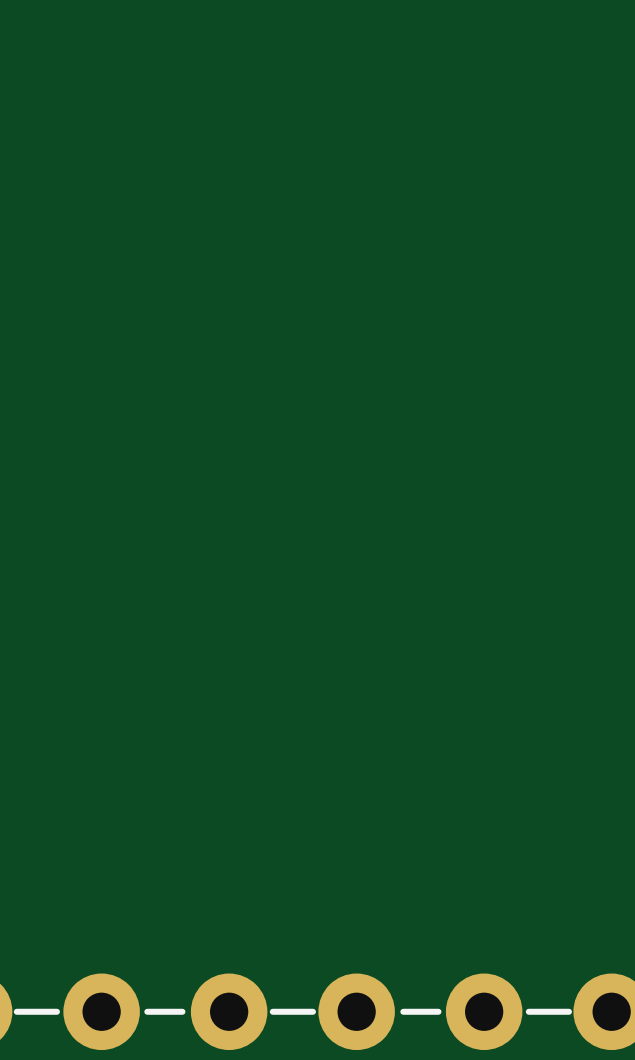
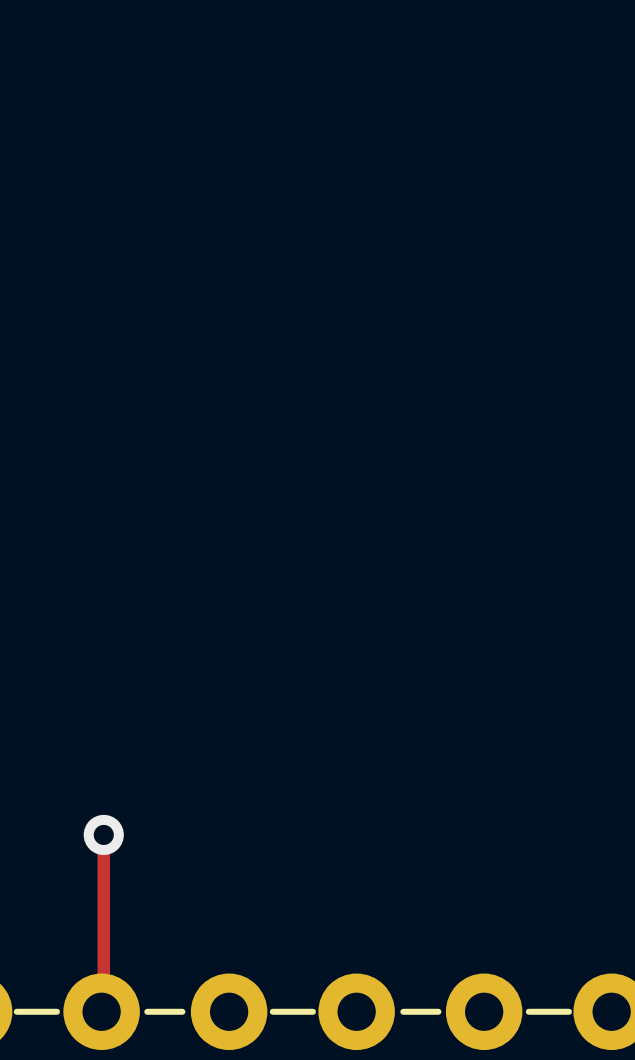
track: none -> (103, 834) (103, 1009) (101, 1011)
via: none -> (103, 834)

